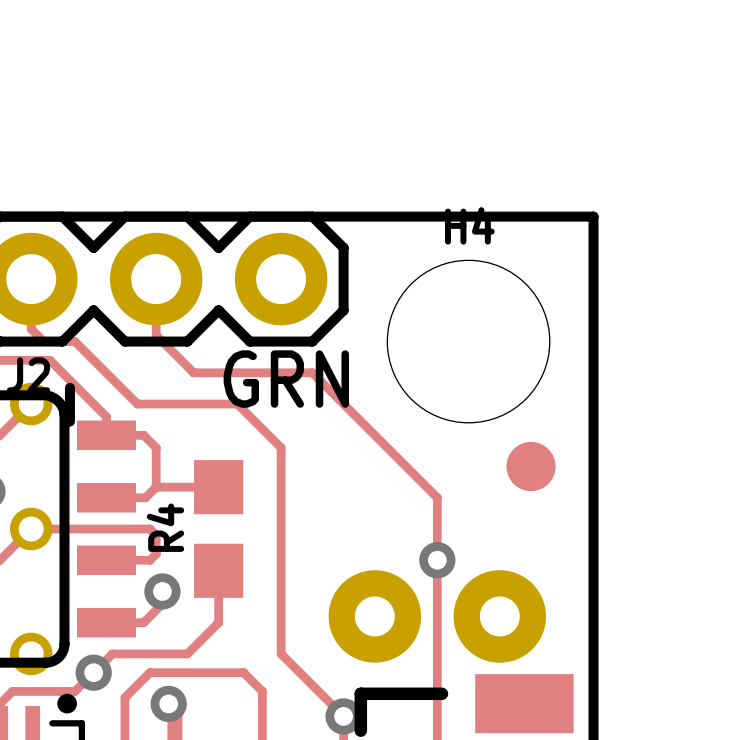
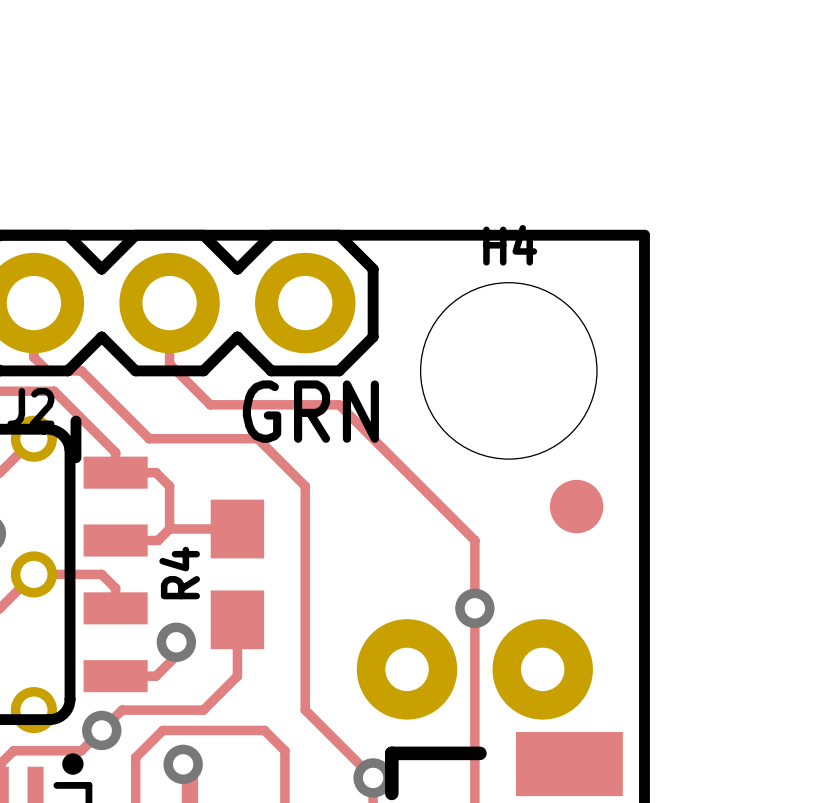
track: (93, 528) (149, 528) (156, 535) (156, 553) (149, 560) (106, 560) -> (101, 574) (115, 588) (115, 608)

